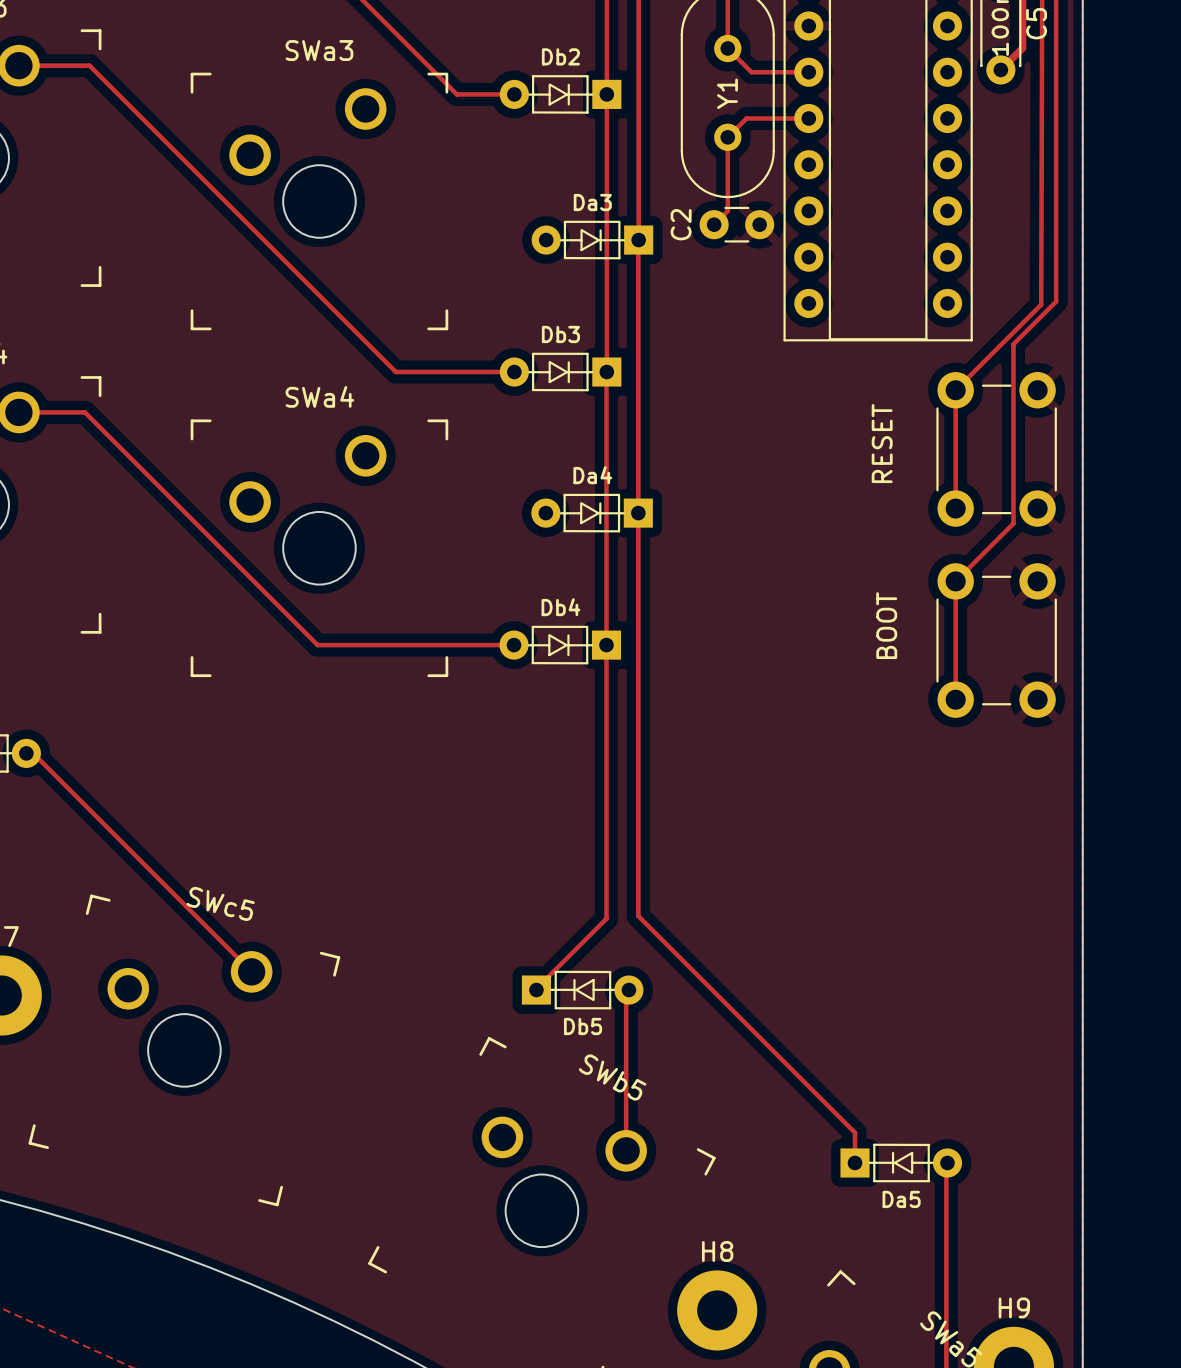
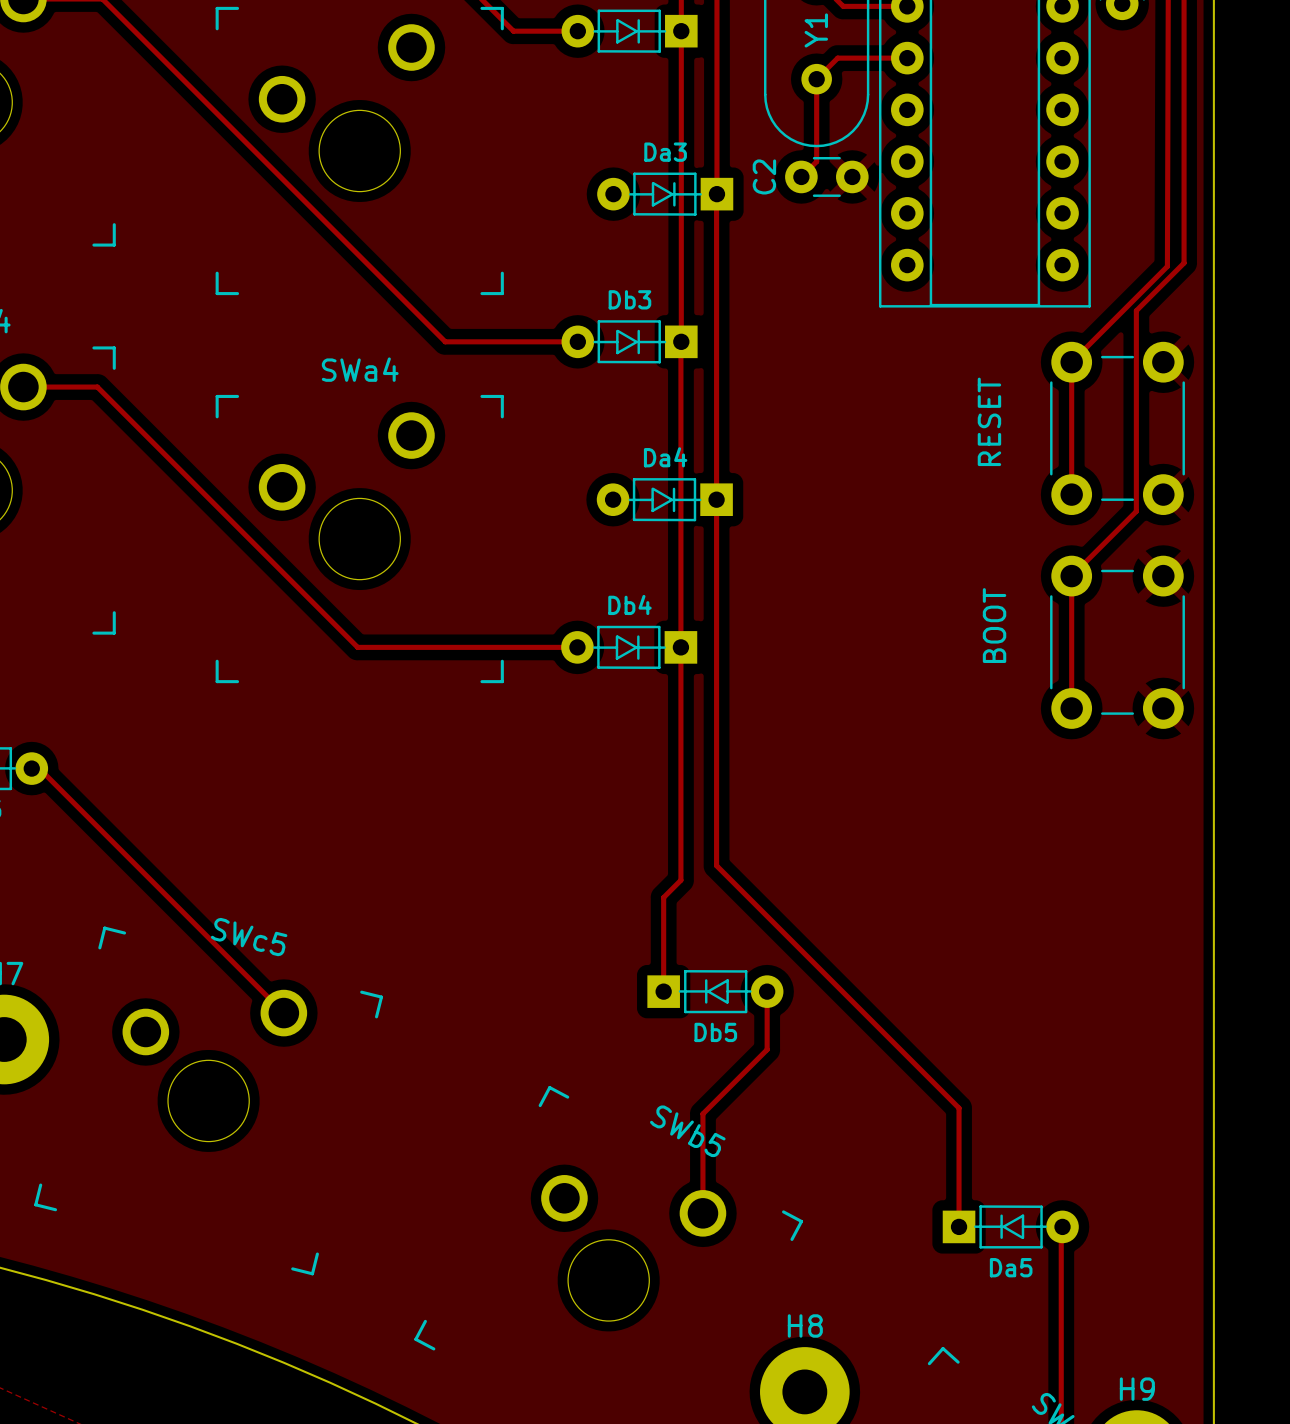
track: (638, 840) (638, 916) (855, 1132) -> (716, 865) (959, 1108) (959, 1193)
track: (606, 853) (606, 918) (536, 990) -> (680, 880) (663, 897) (663, 991)
Db5 position: (582, 990) -> (715, 991)
track: (628, 990) (626, 992) (626, 1061) -> (767, 991) (767, 1049) (702, 1113)

